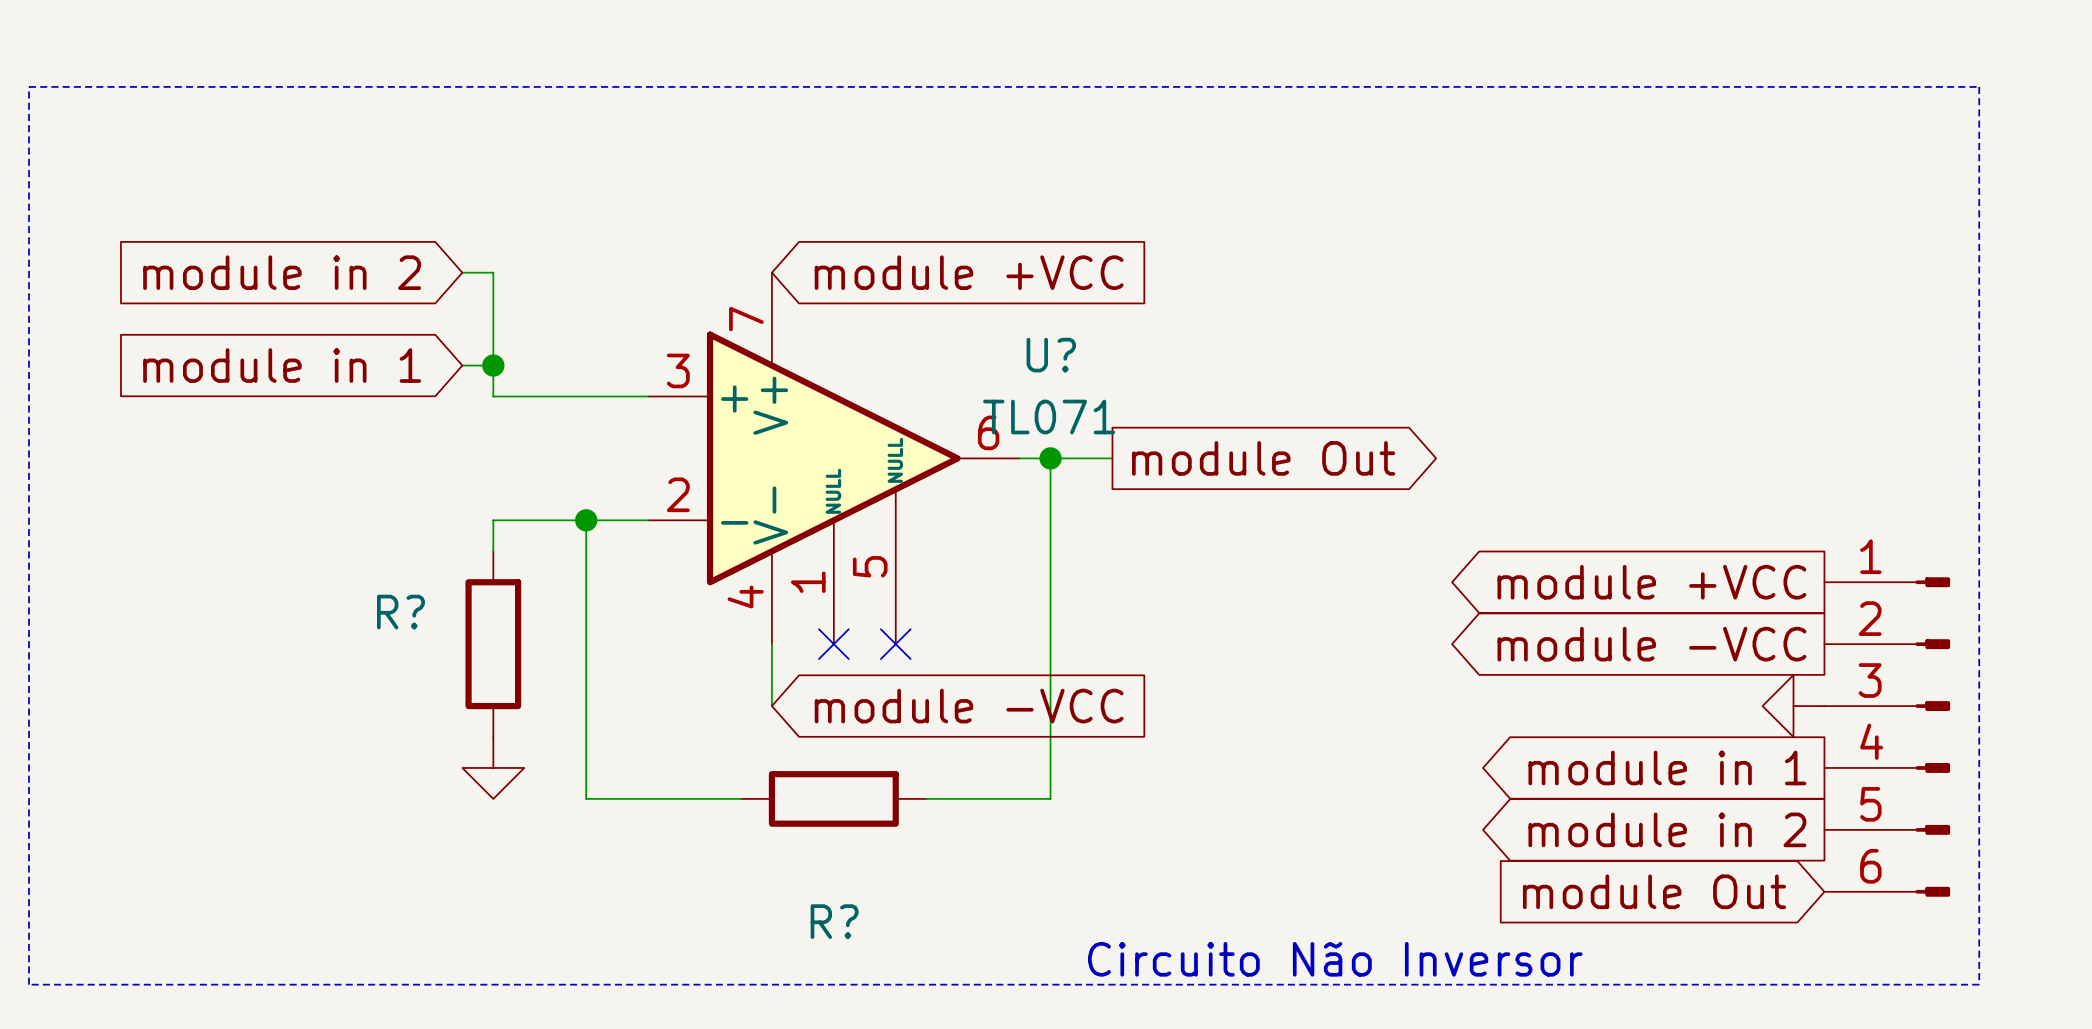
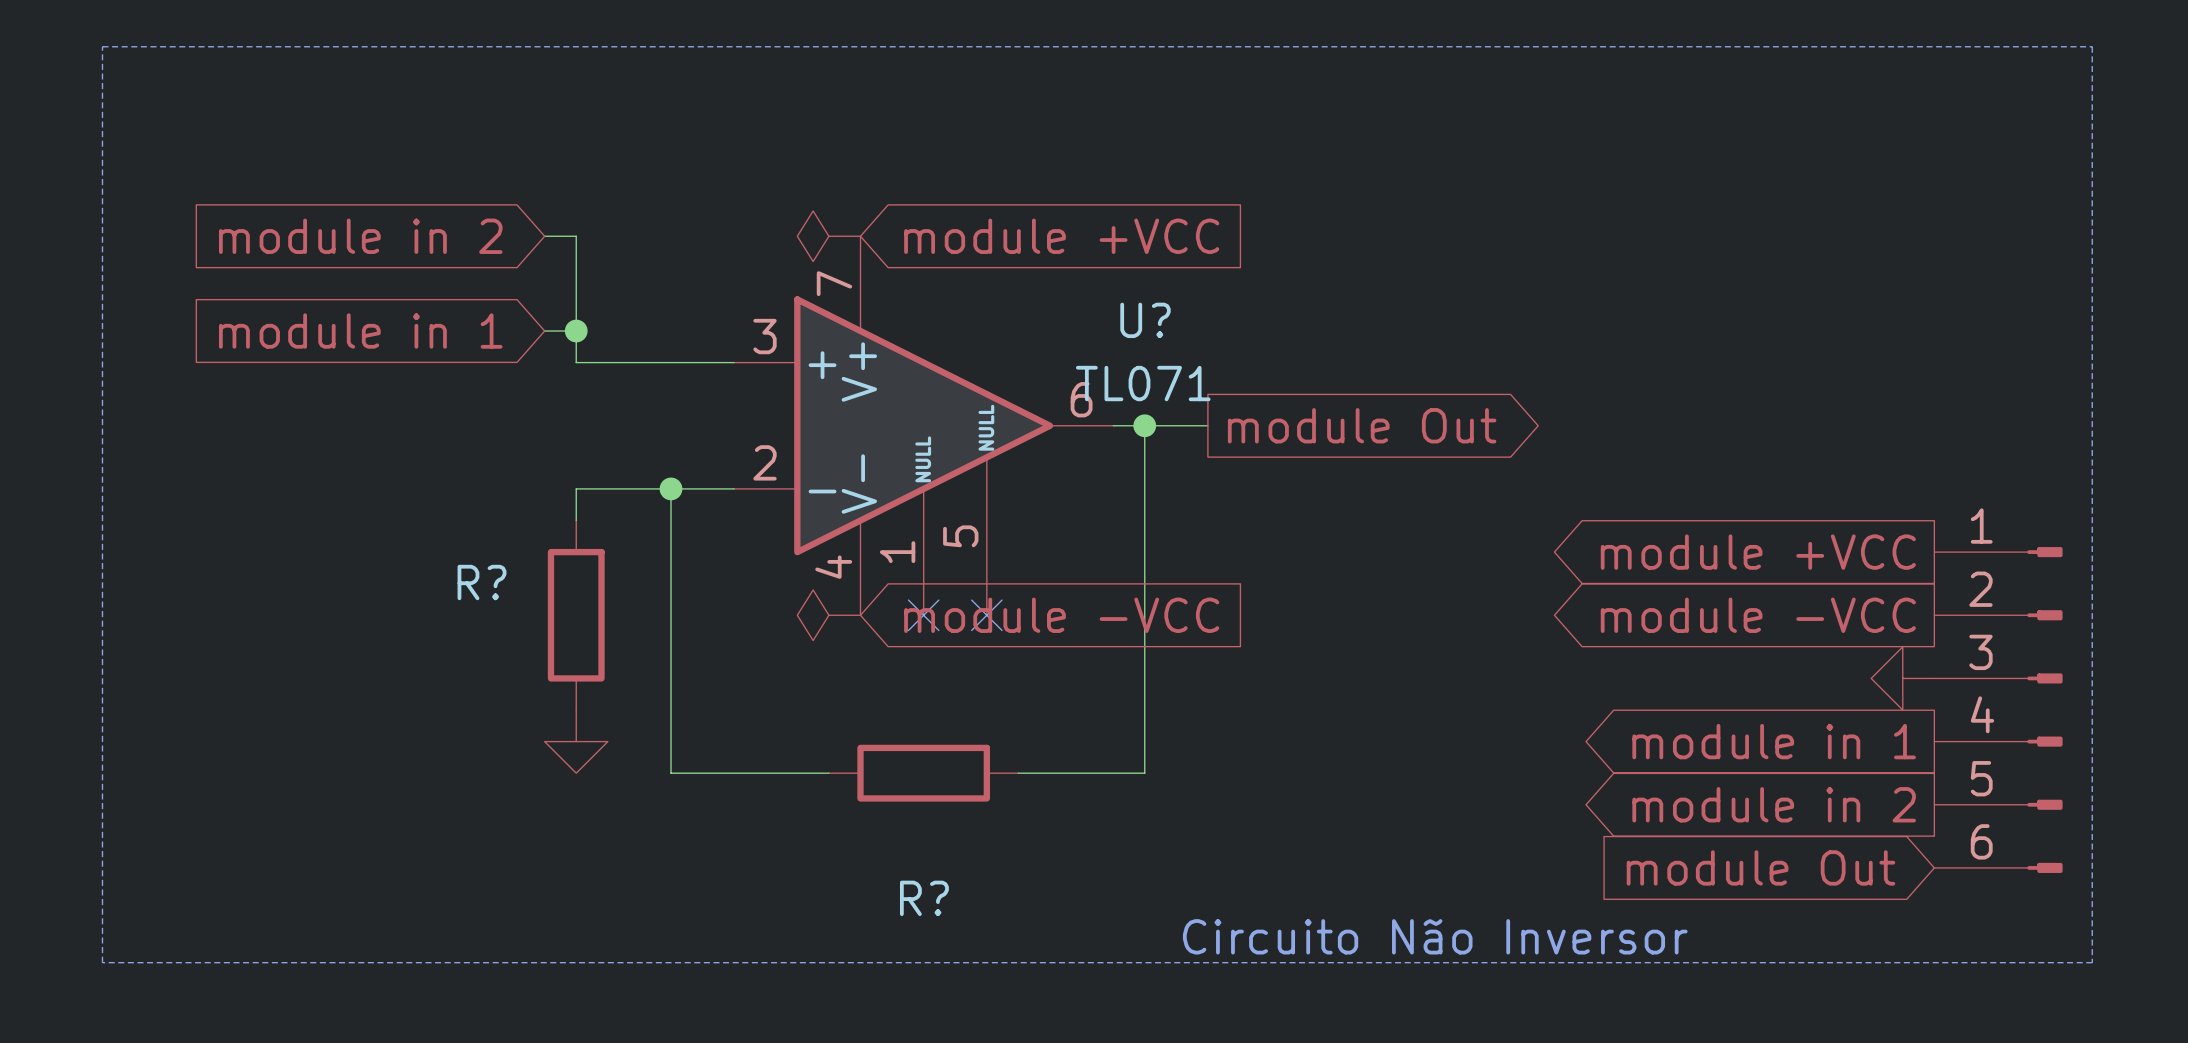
power symbol: none -> (828, 236)
power symbol: none -> (828, 615)
wire: (771, 644) (771, 706) -> none
global label position: module -VCC (969, 706) -> module -VCC (1061, 615)

